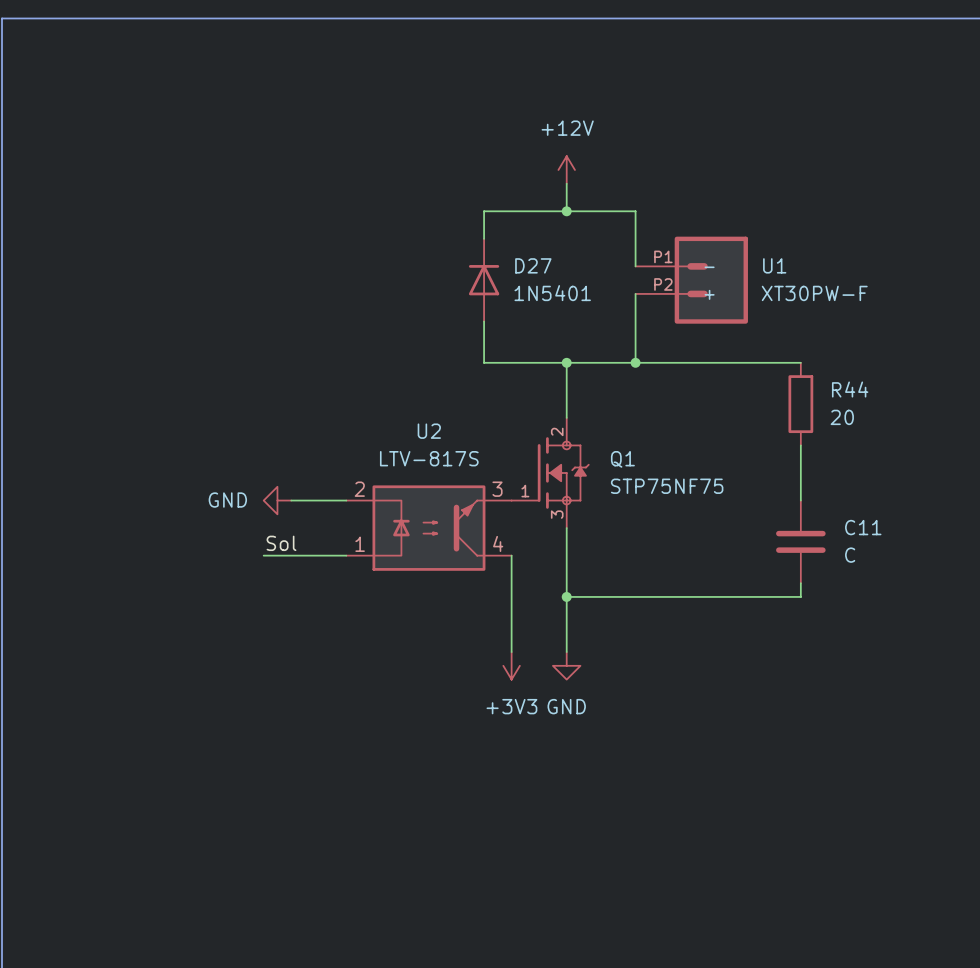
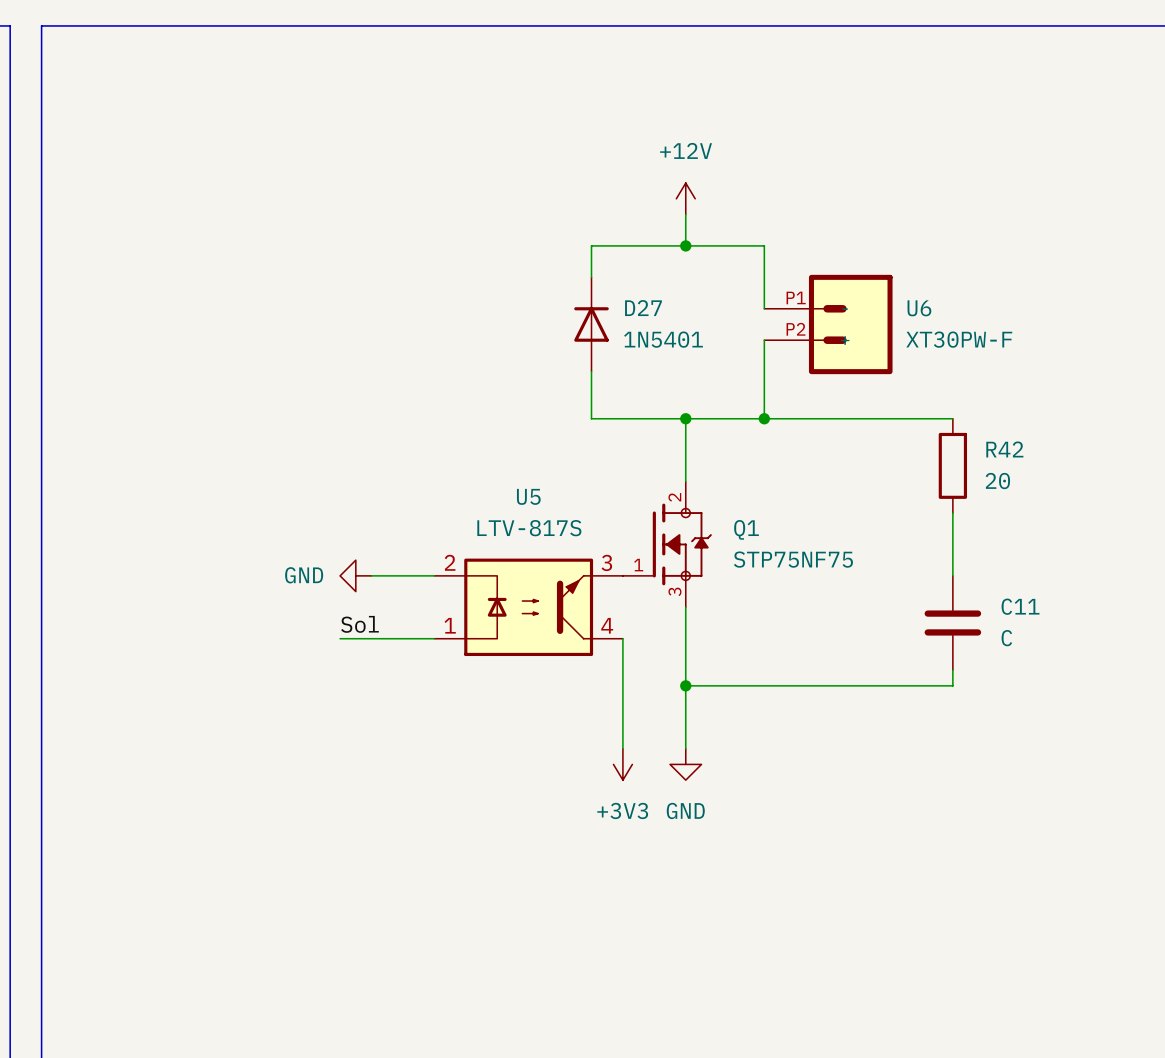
U1 name: U1 (774, 265) -> U6 (919, 308)
R44 name: R44 (850, 389) -> R42 (1004, 449)
U2 name: U2 (429, 431) -> U5 (528, 496)

